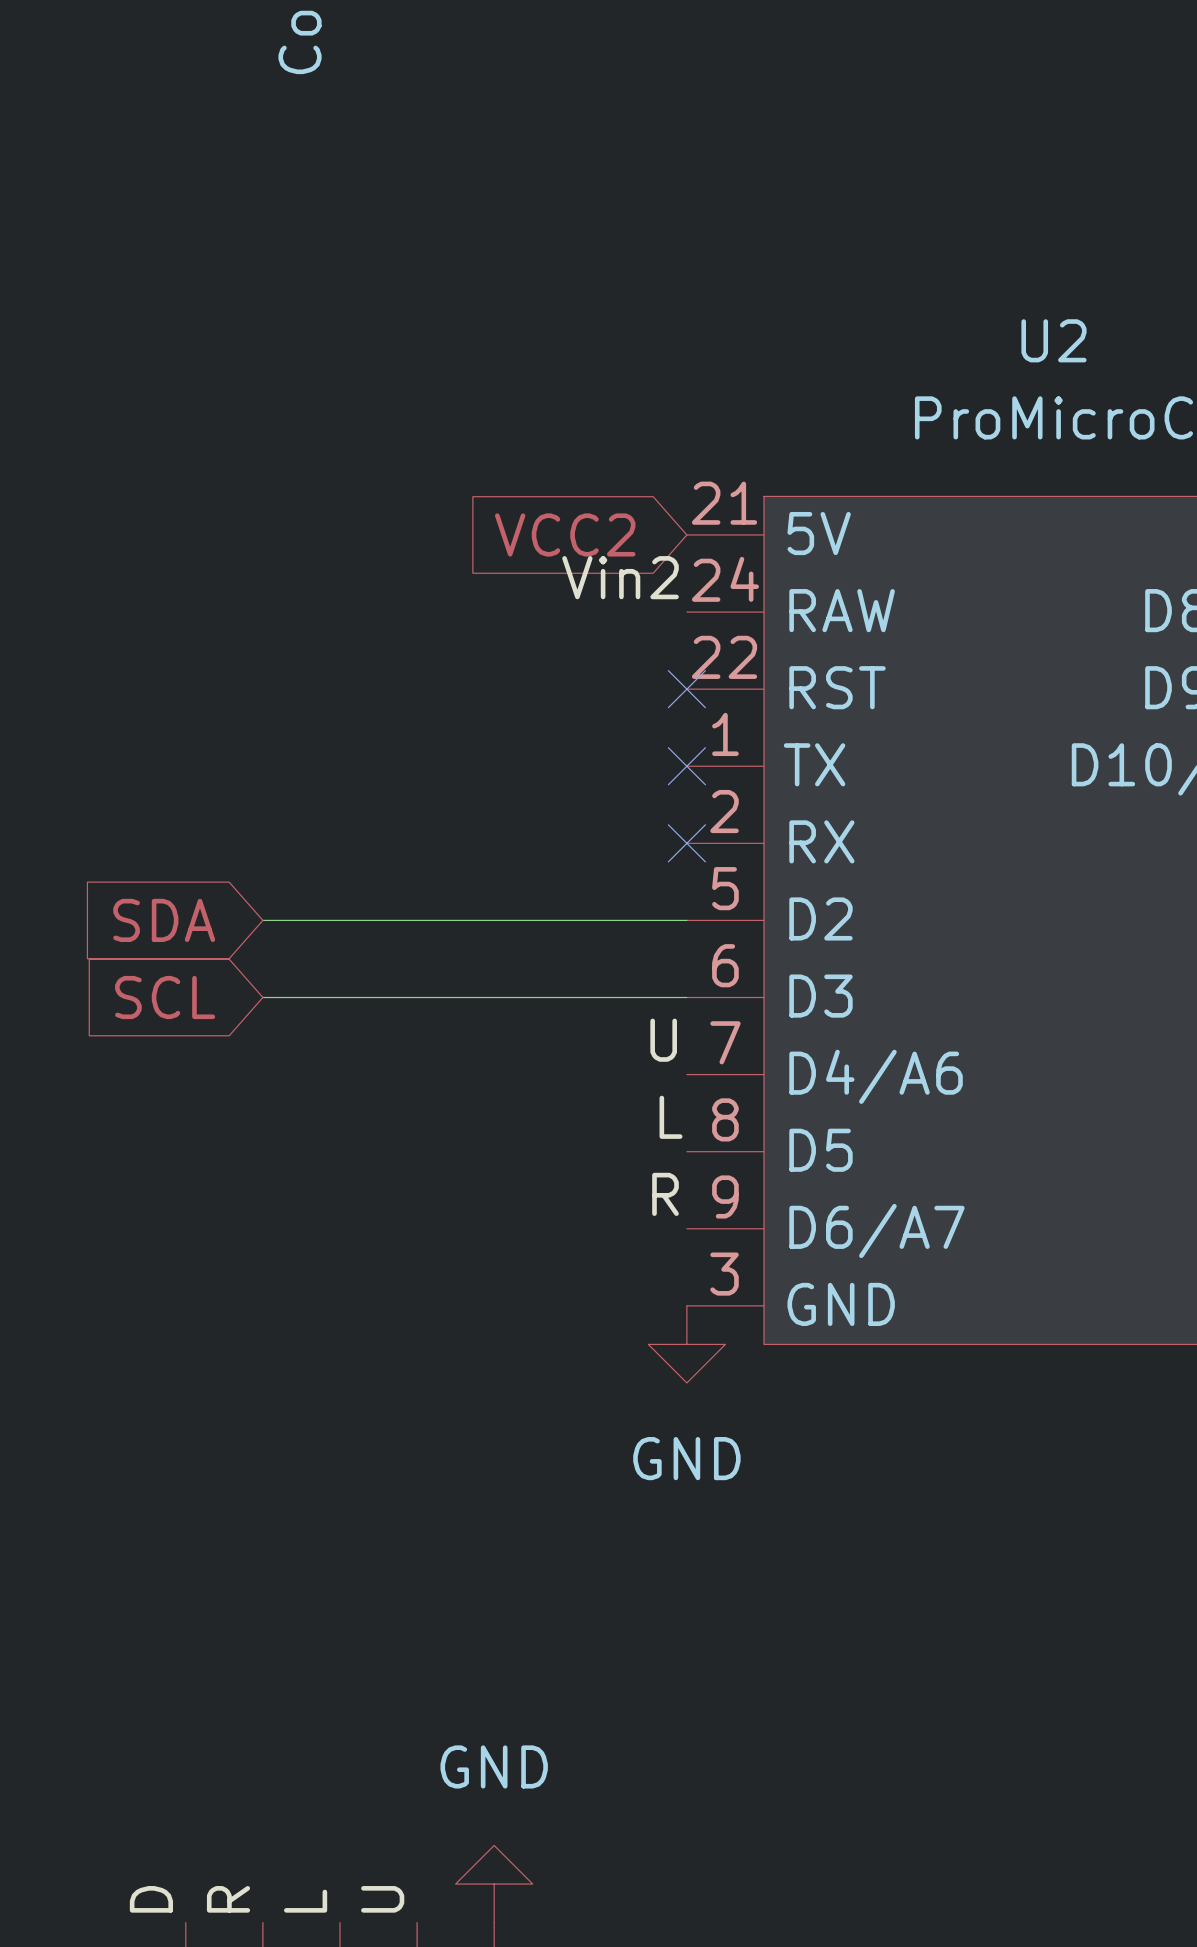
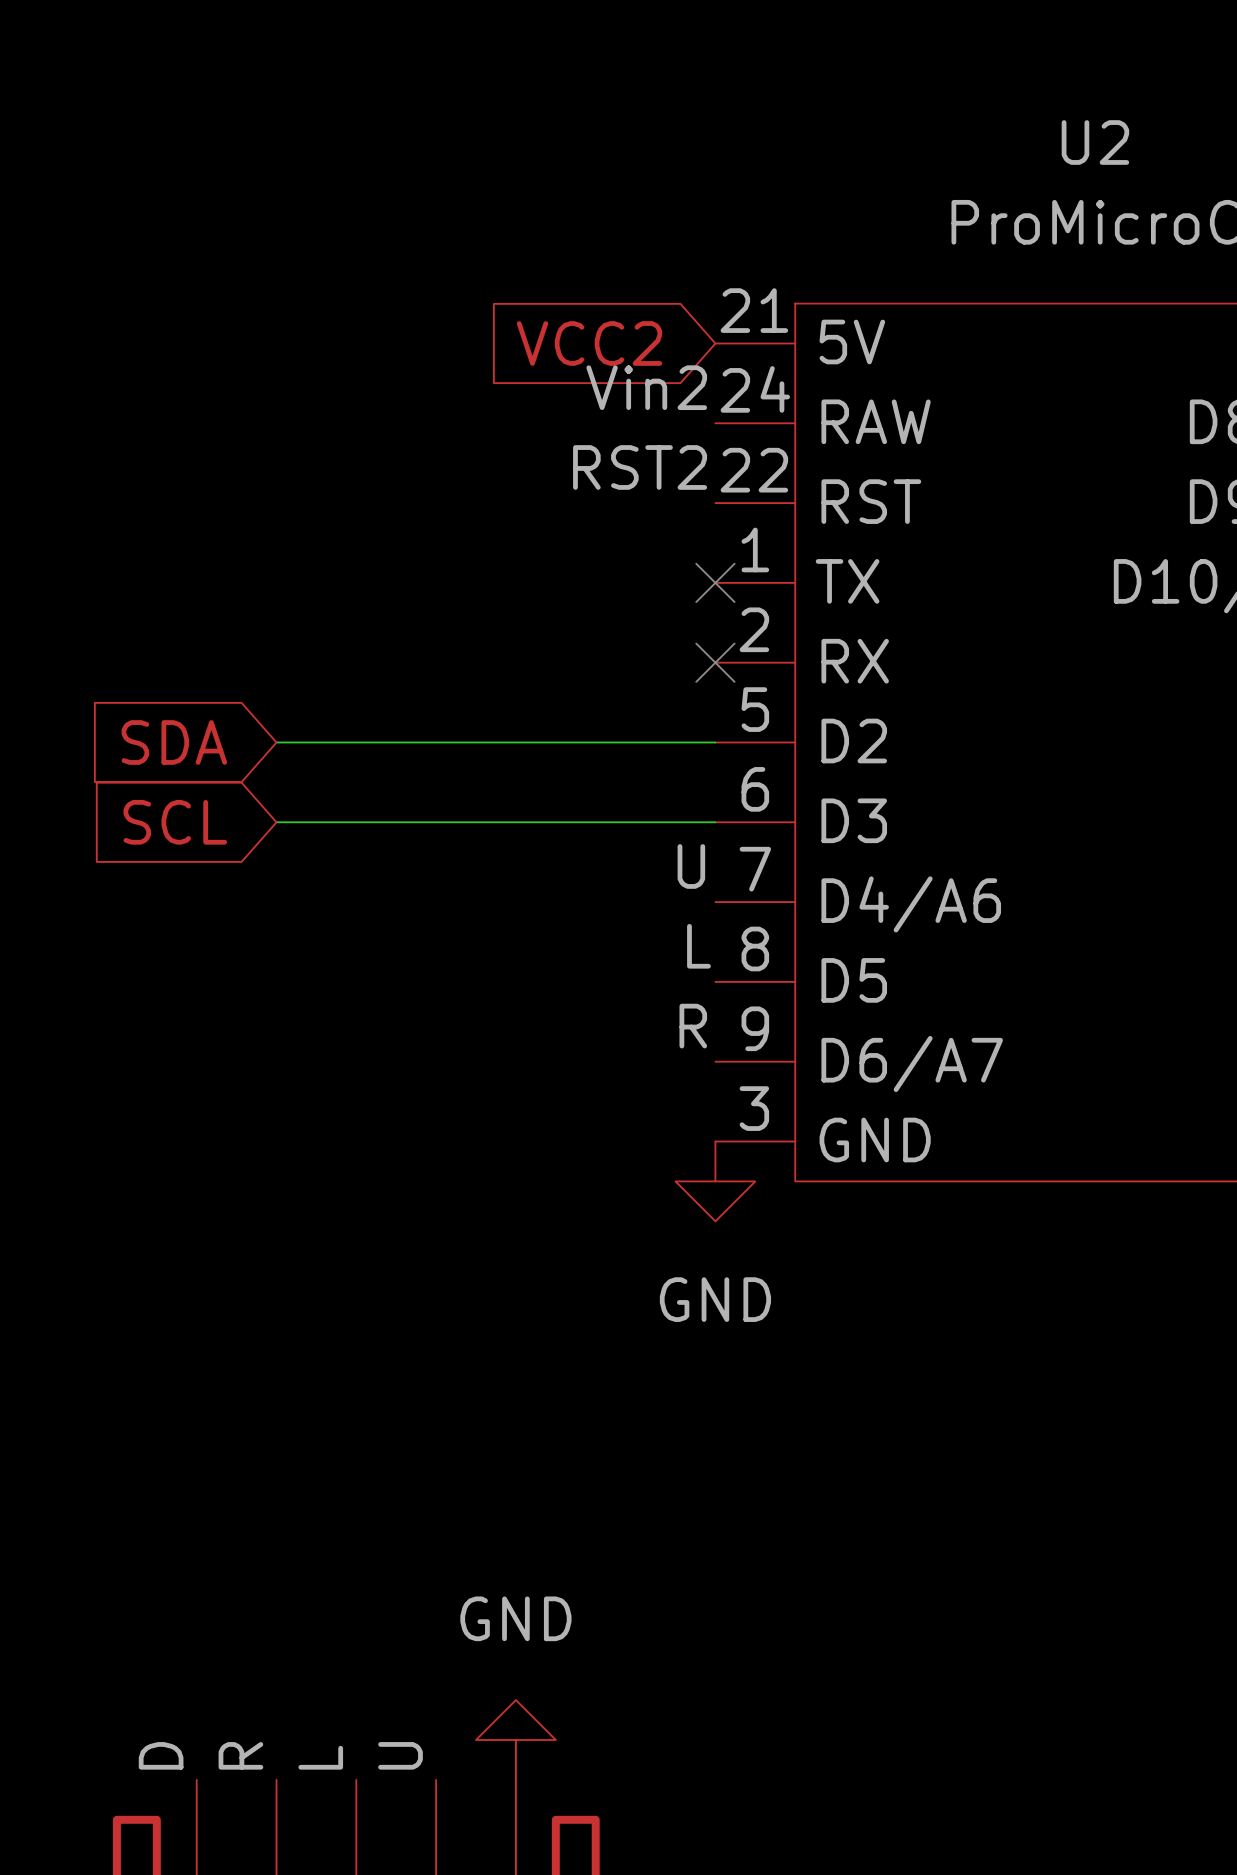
label: none -> RST2 (640, 467)
no-connect mark: (686, 689) -> none

